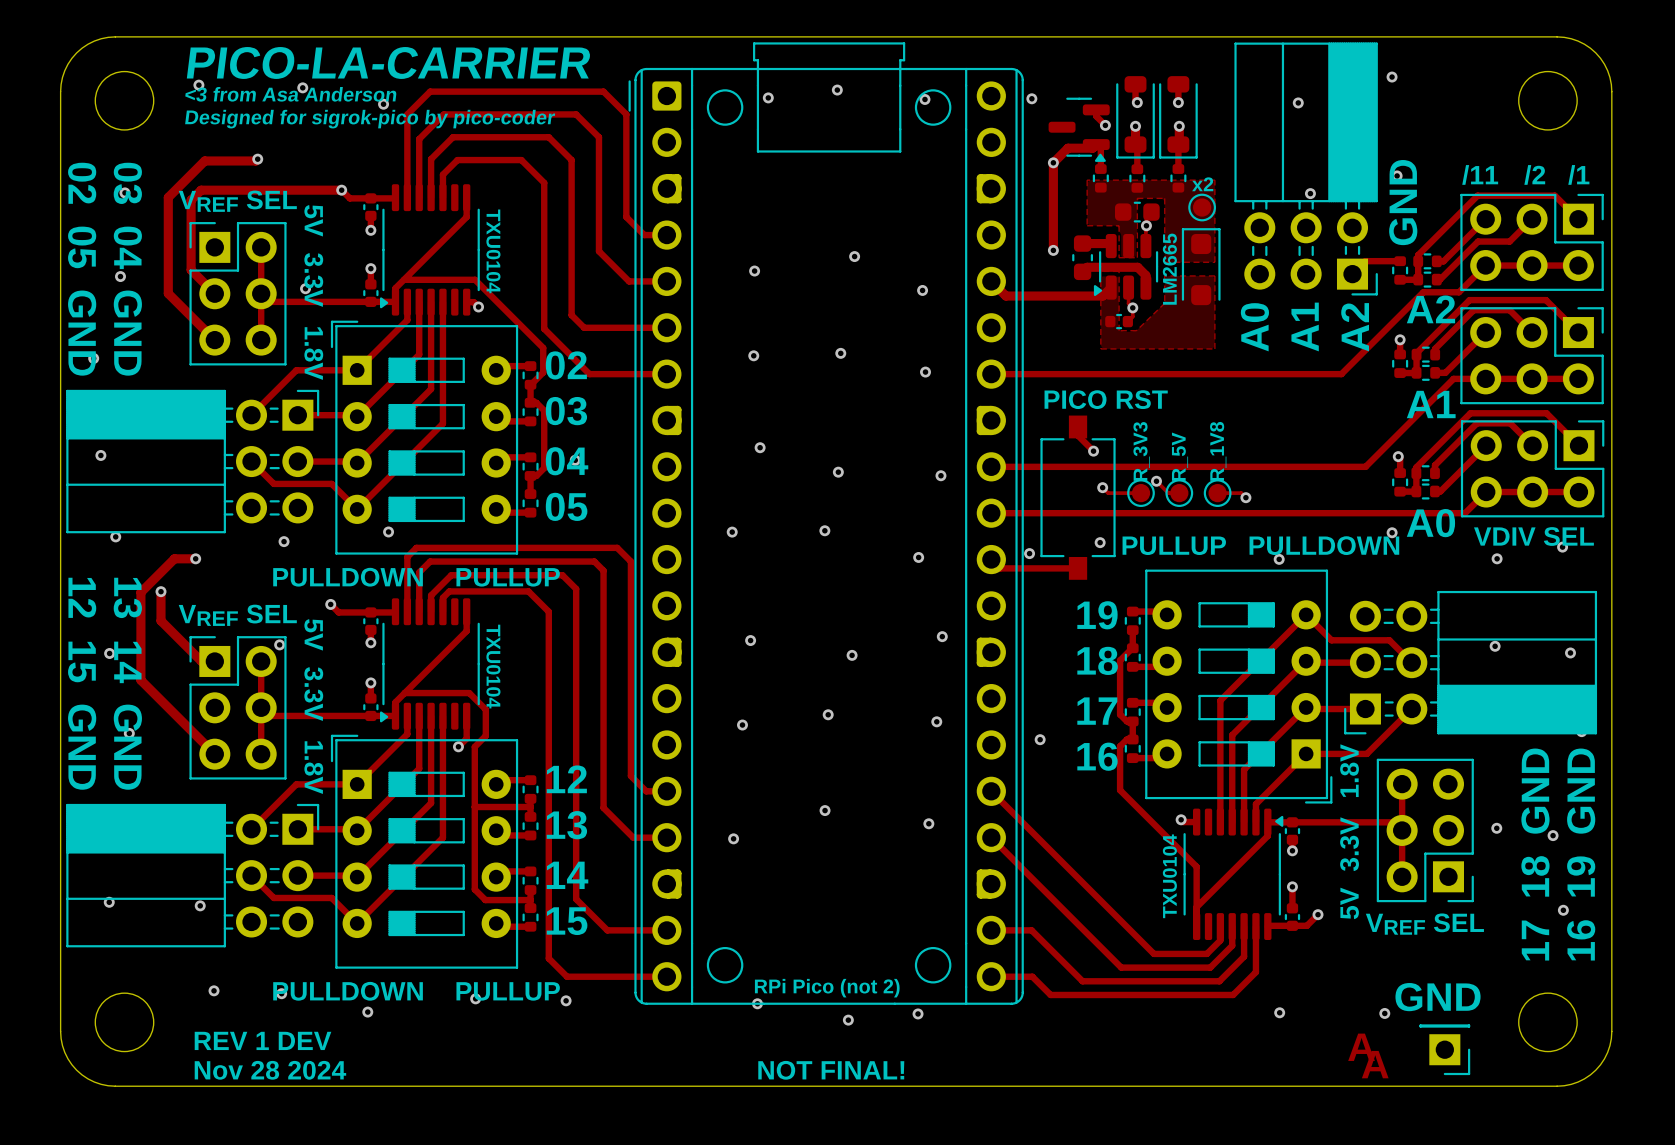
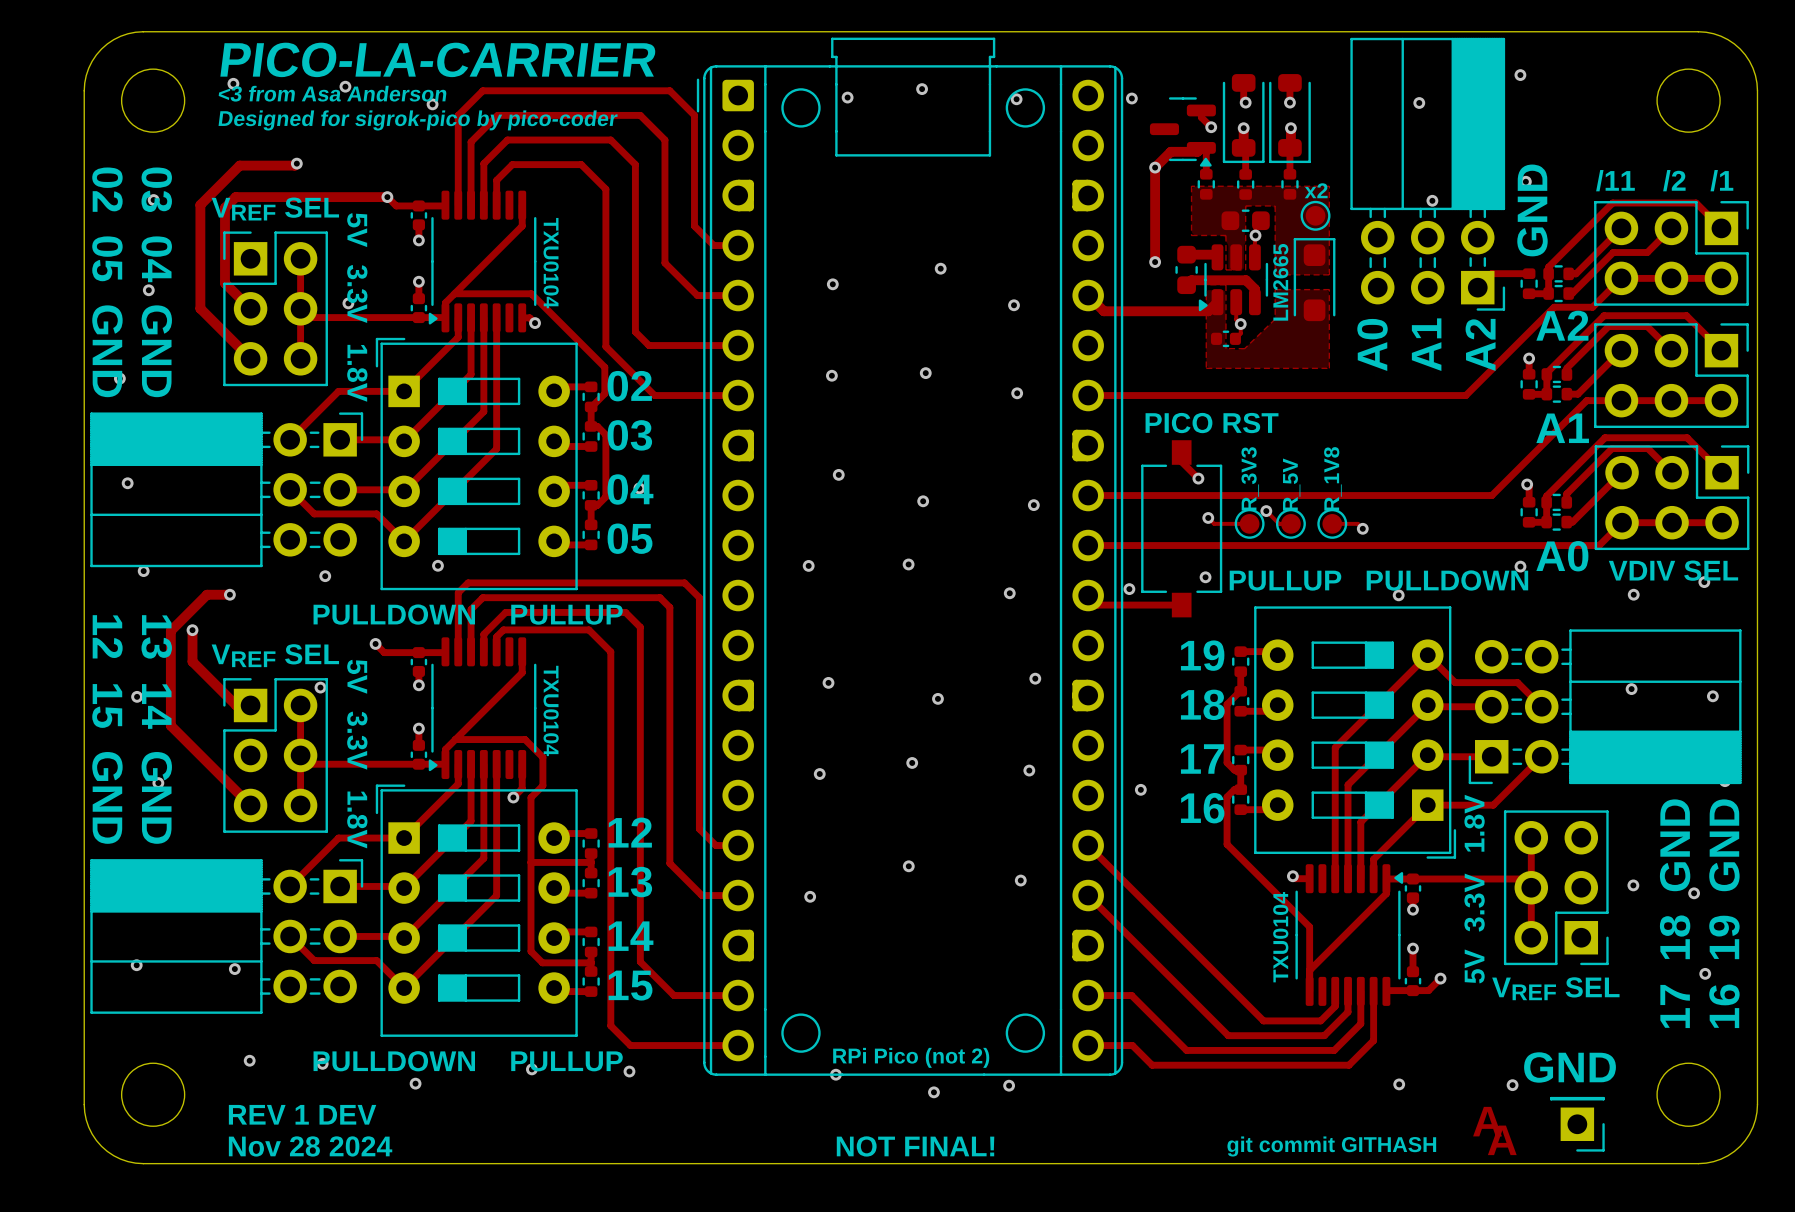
text: none -> git commit GITHASH (1331, 1146)

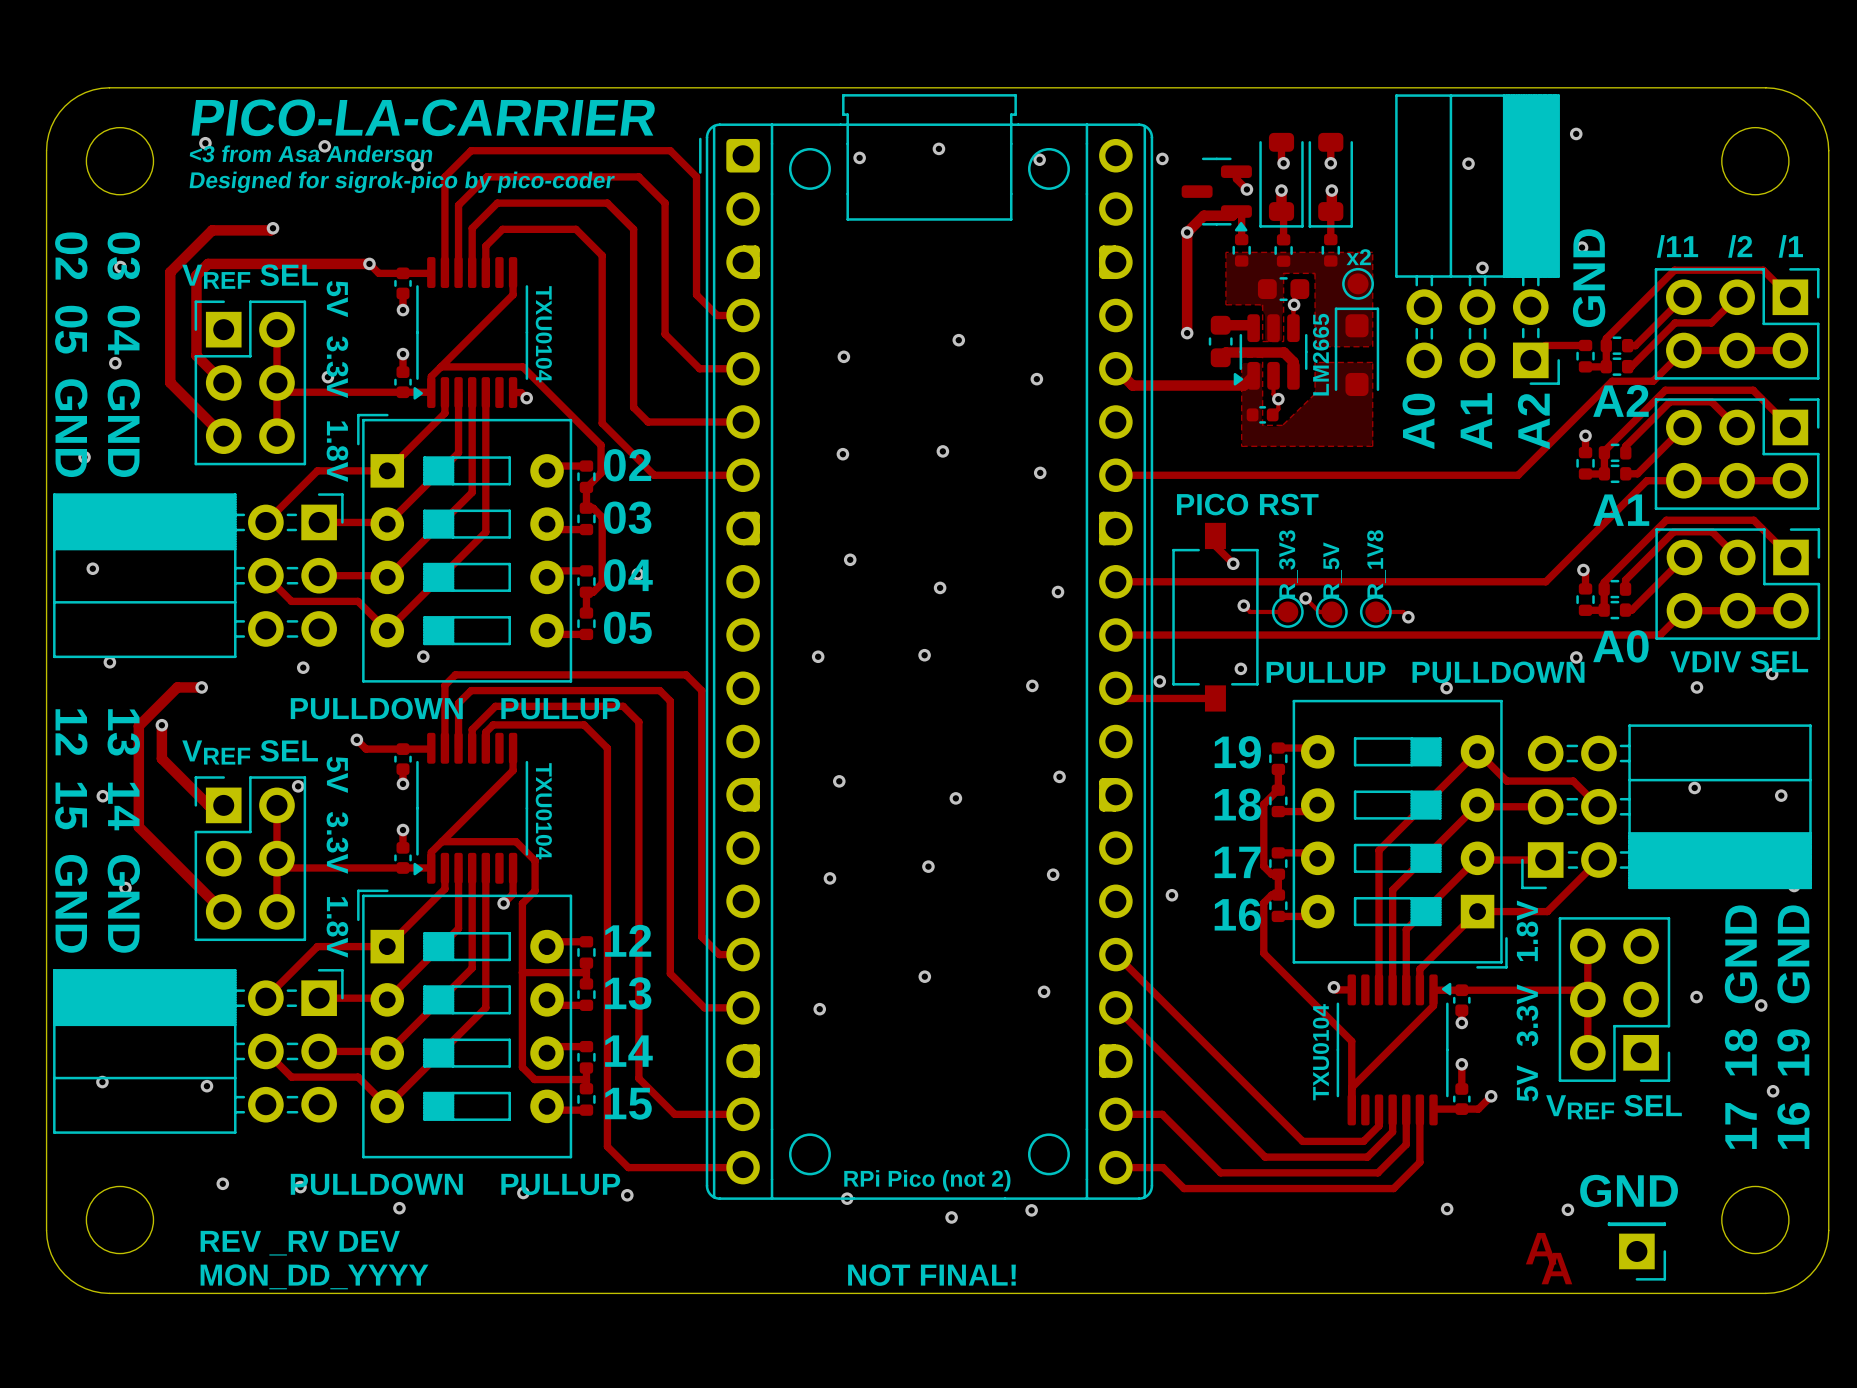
text: REV 1 DEV (302, 1114) -> REV _RV DEV (300, 1243)
text: Nov 28 2024 (310, 1146) -> MON_DD_YYYY (314, 1276)
text: git commit GITHASH (1331, 1146) -> none

